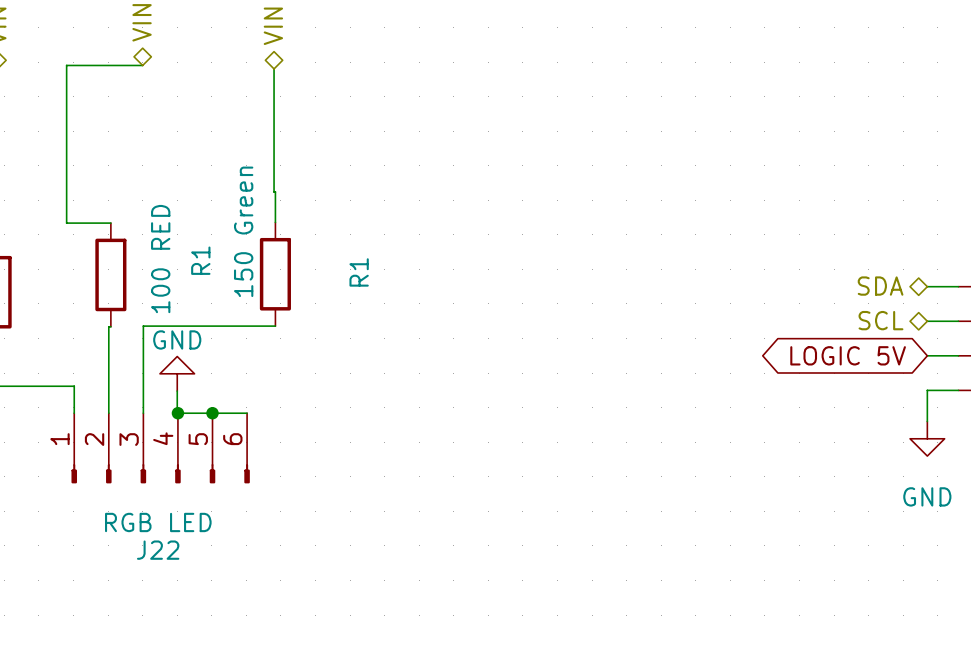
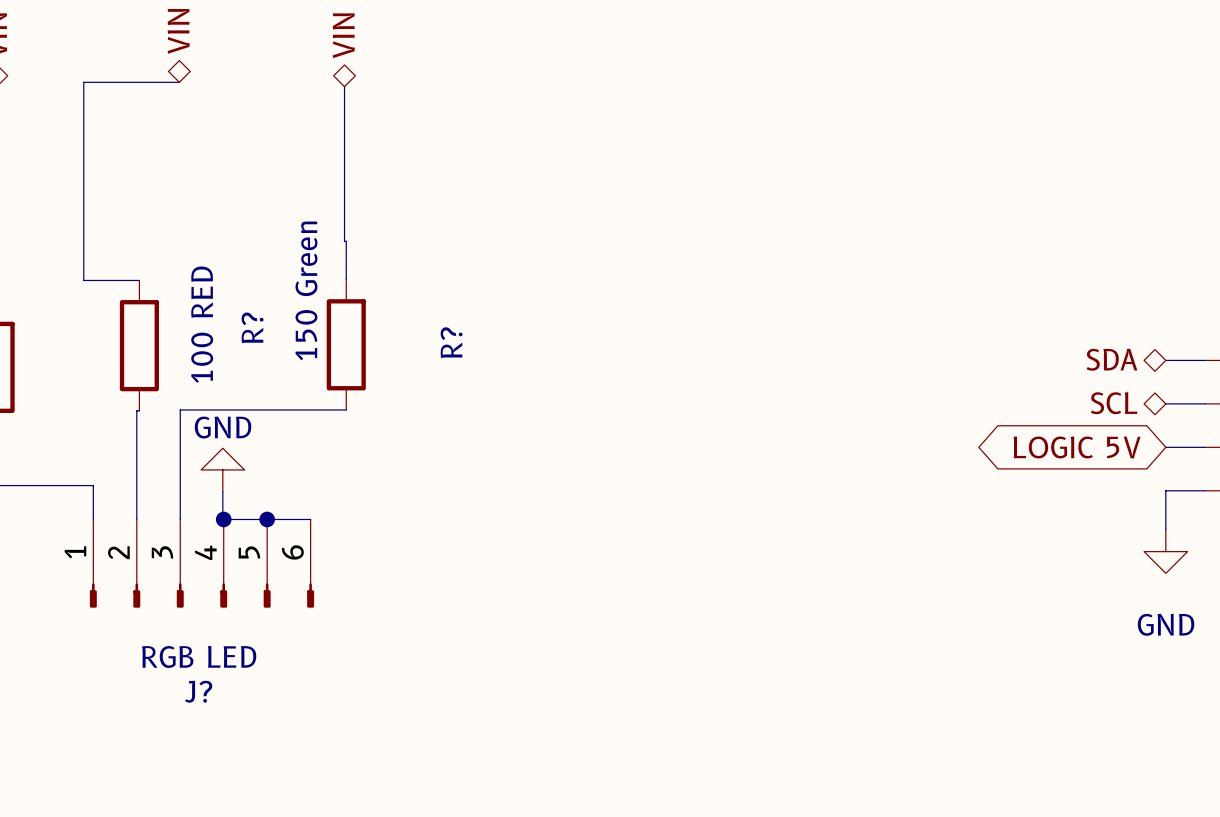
R1 name: R1 (200, 260) -> R? (252, 327)
R1 name: R1 (359, 272) -> R? (451, 342)
J22 name: J22 (158, 550) -> J? (198, 691)

